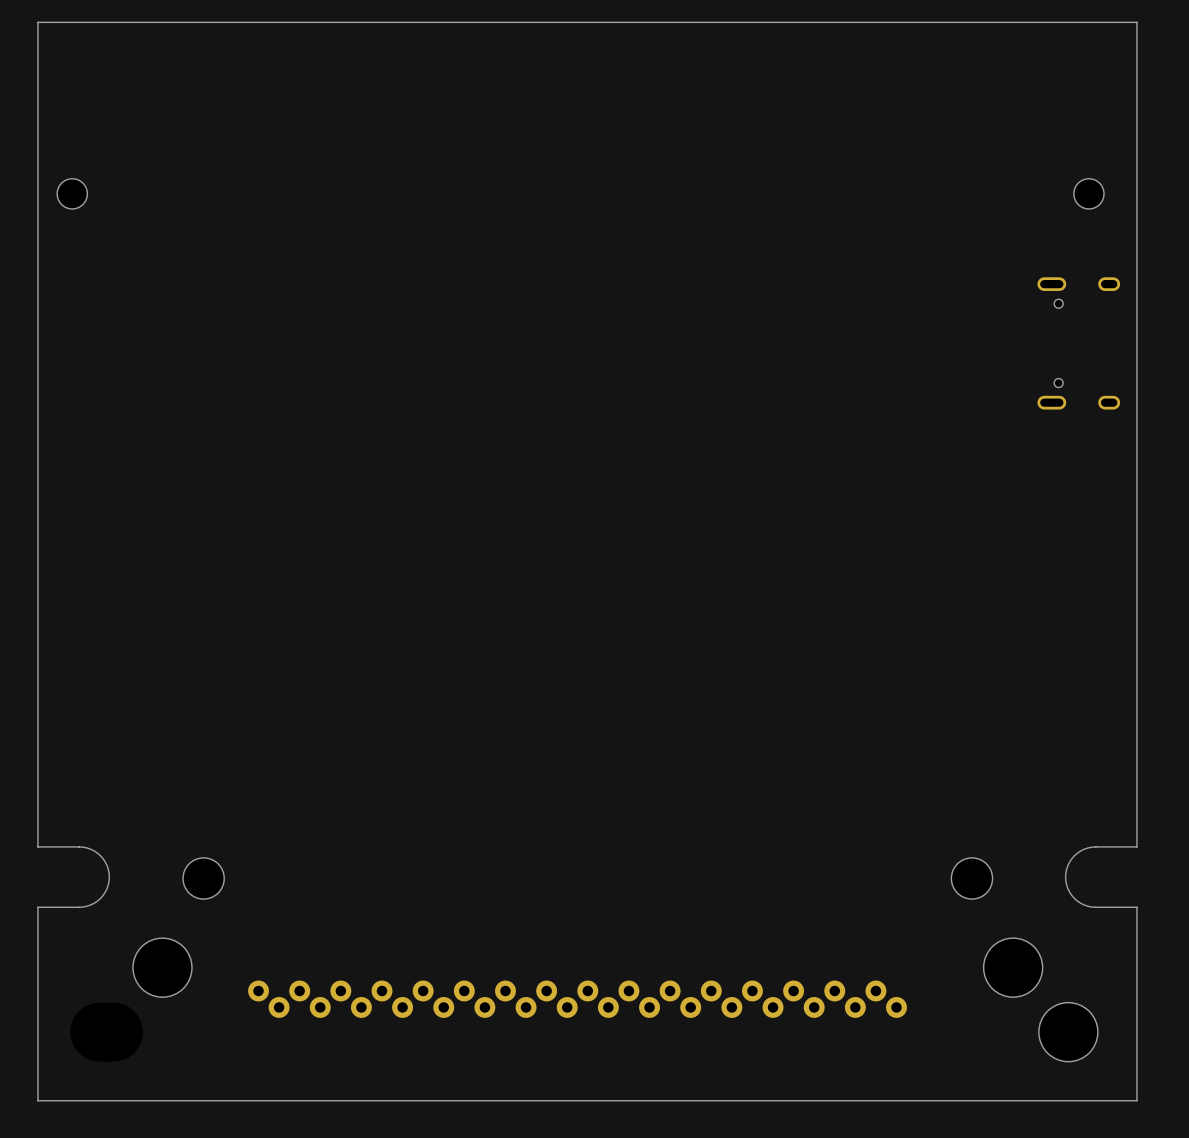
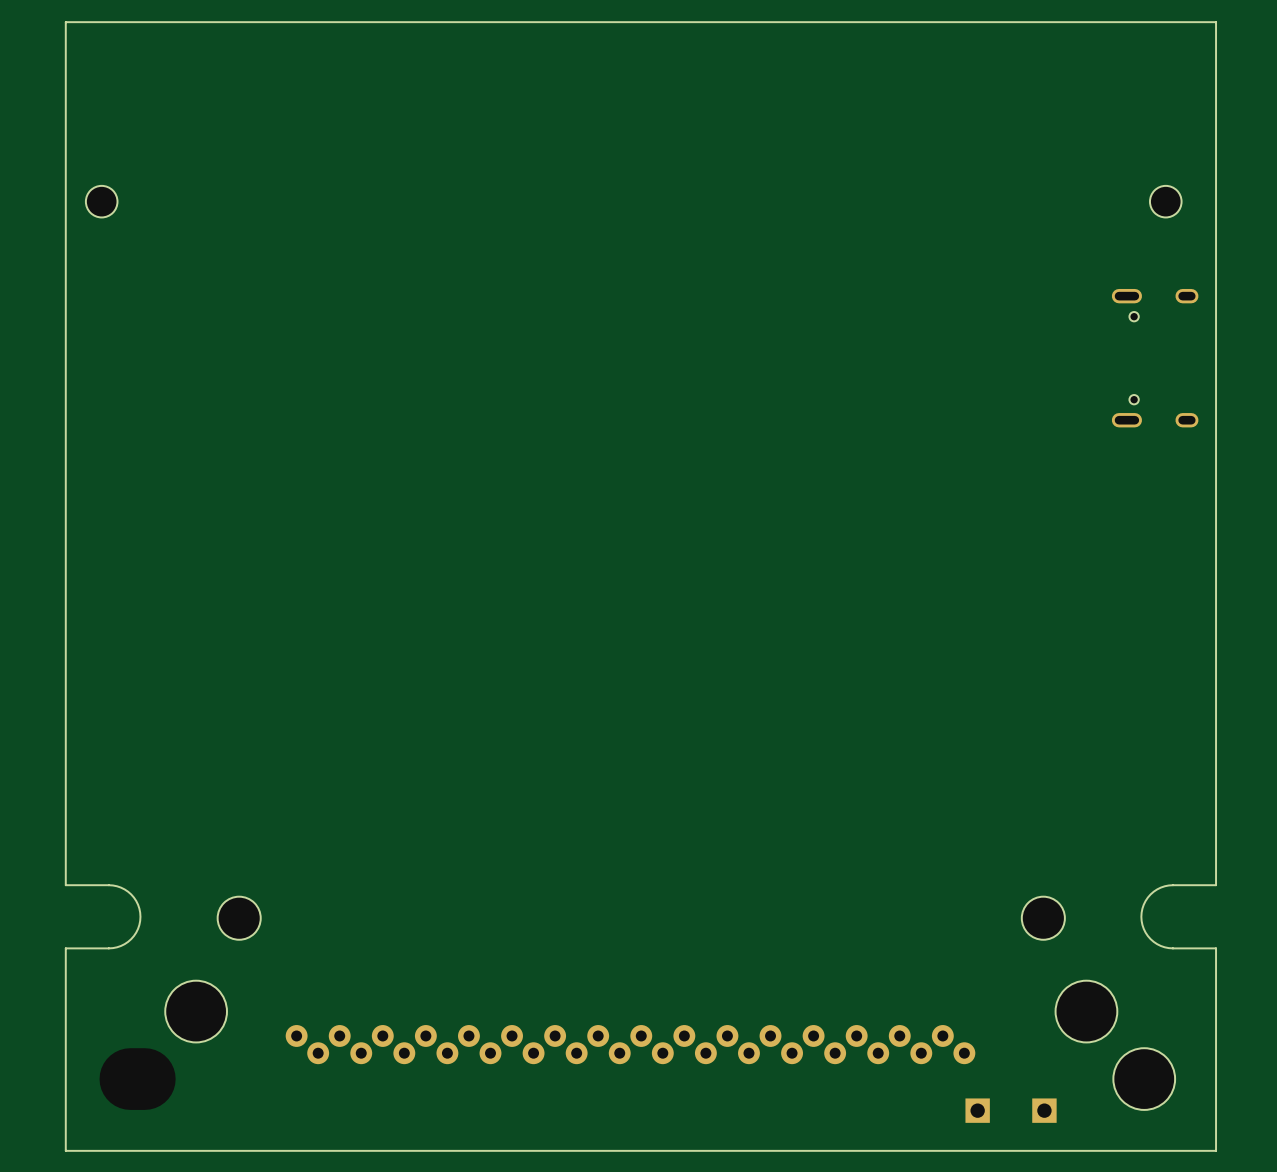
part: none -> (977, 1110)
part: none -> (1044, 1110)

